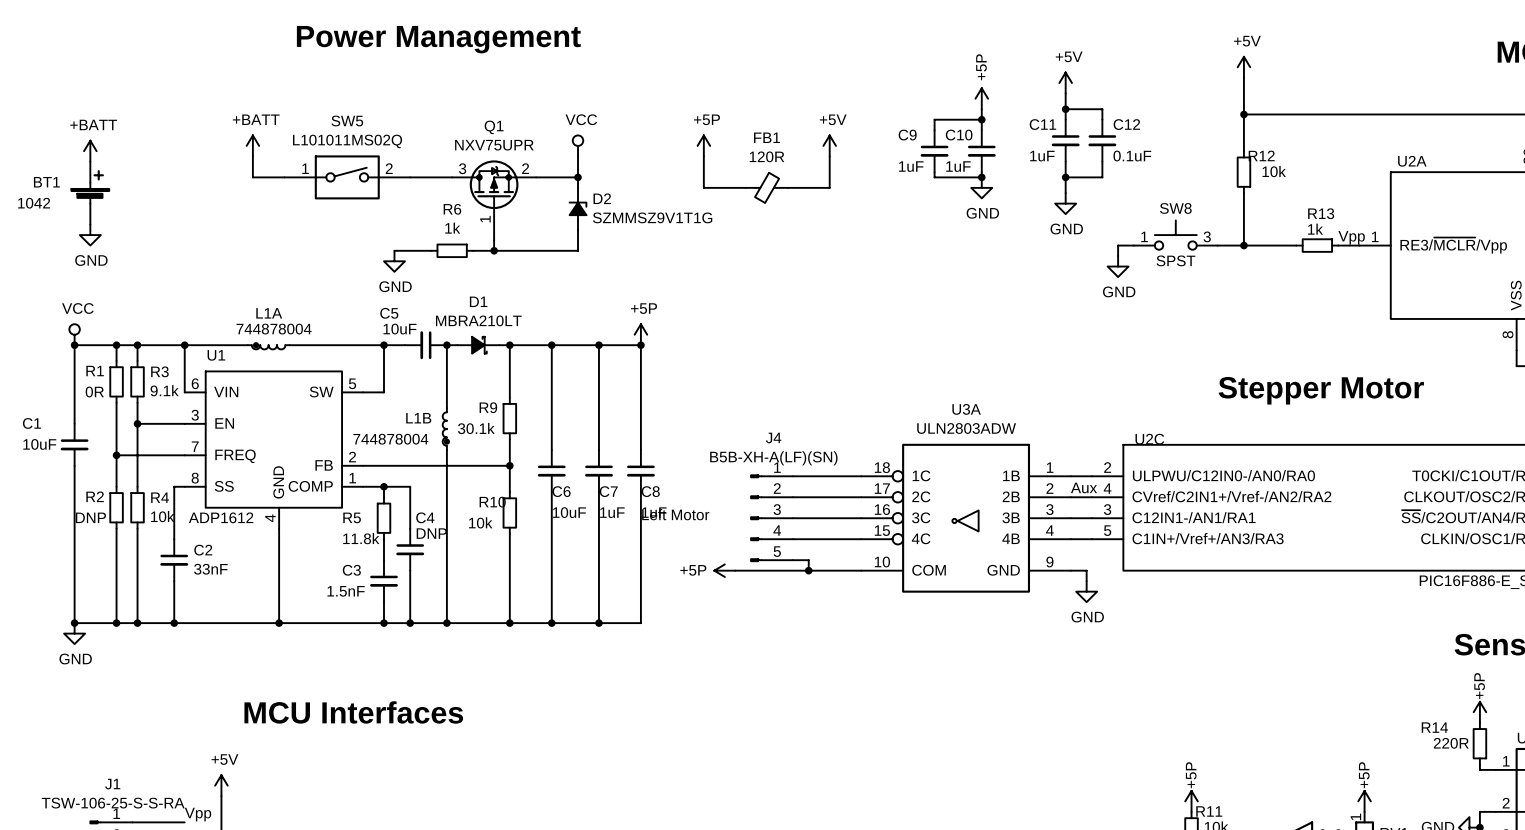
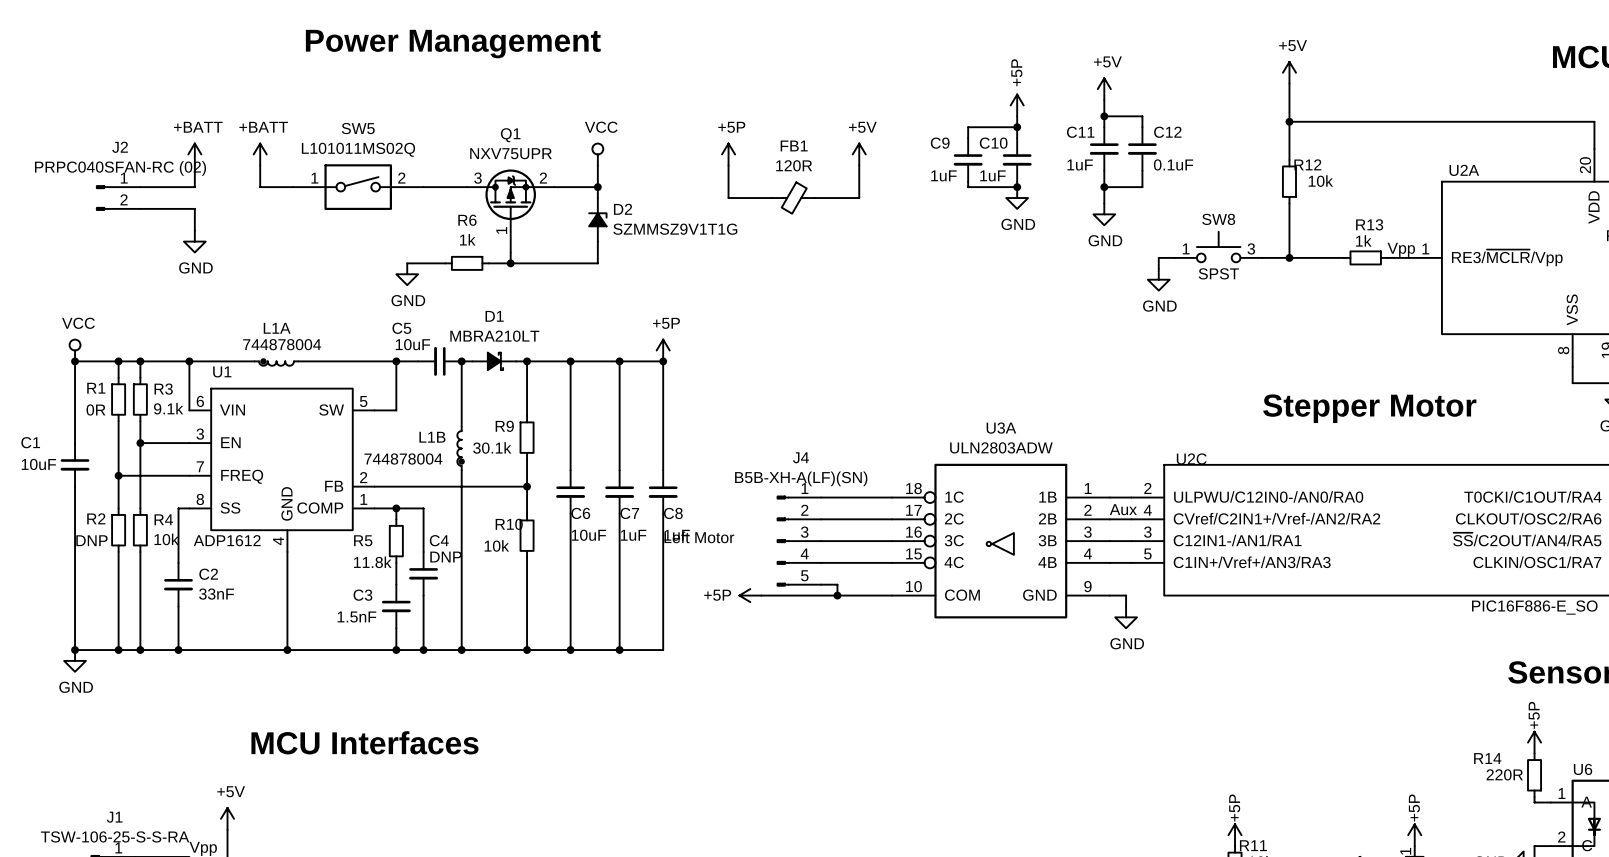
power symbol position: +BATT (90, 151) -> +BATT (194, 154)
wire: none -> (194, 165) (194, 187) (140, 187)
J2: none -> PRPC040SFAN-RC (02) (118, 198)
BT1: 1042 (90, 193) -> none
wire: none -> (140, 208) (194, 208) (194, 230)
power symbol position: GND (90, 235) -> GND (194, 241)

